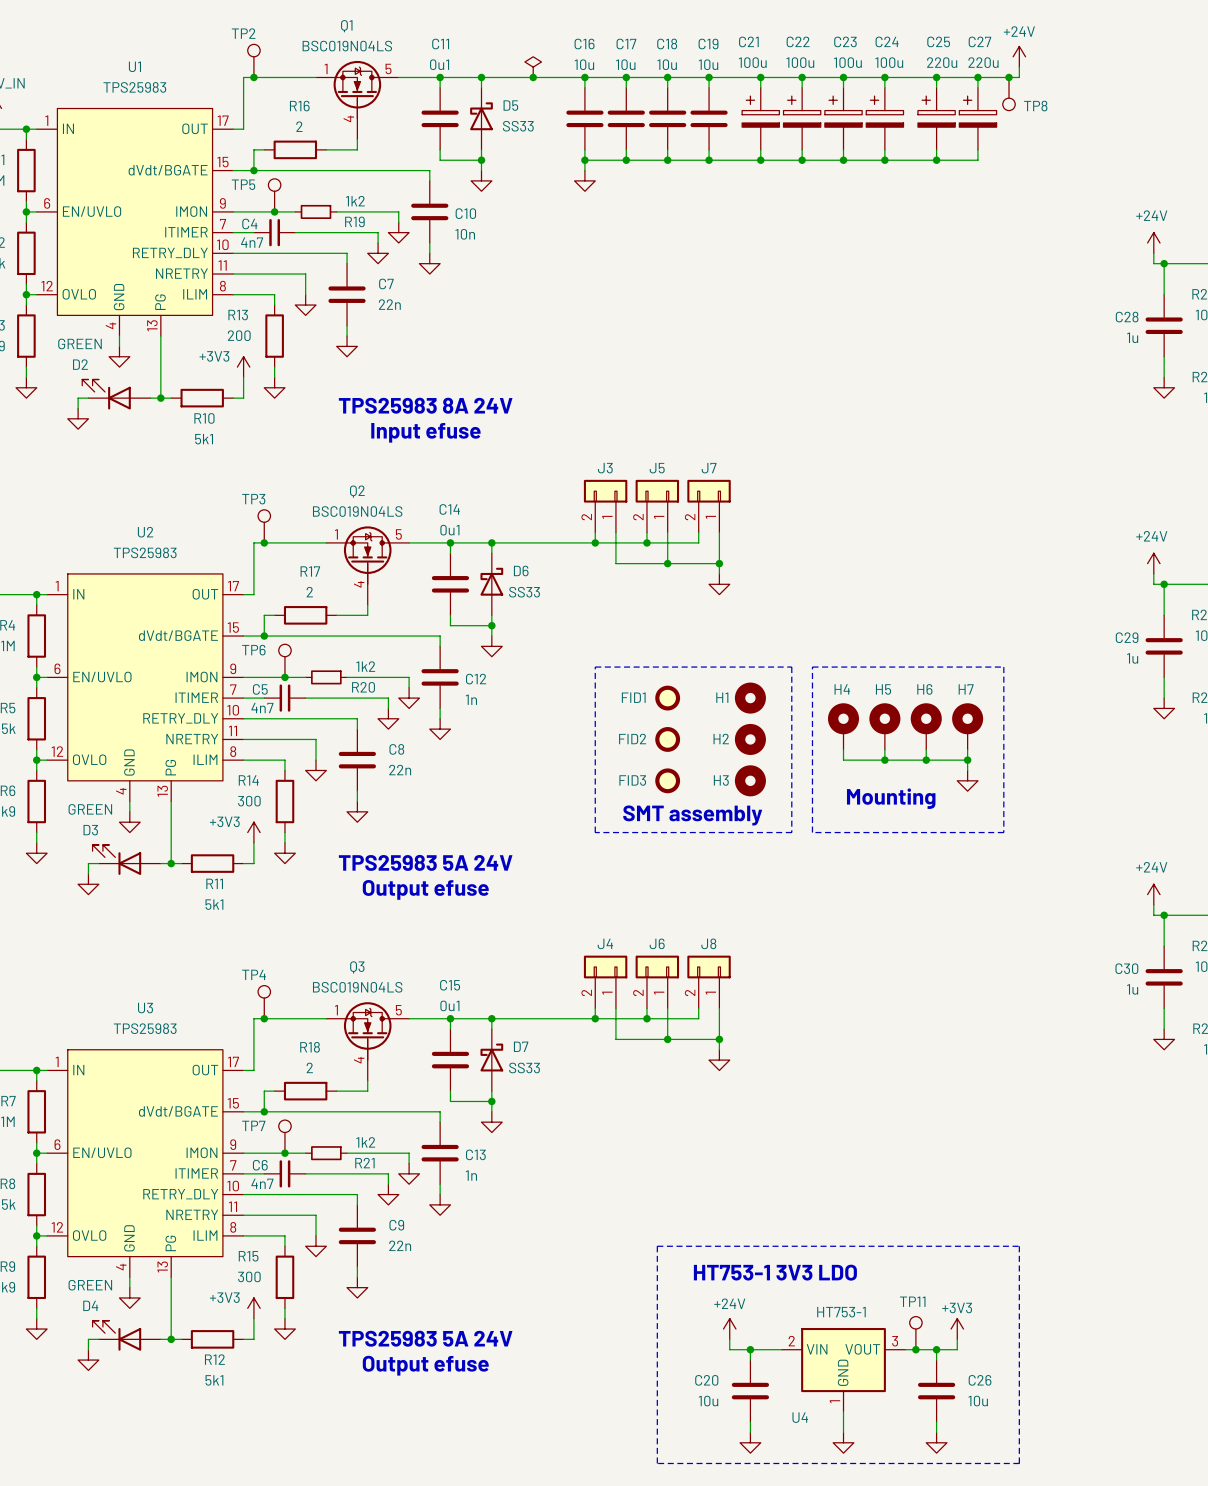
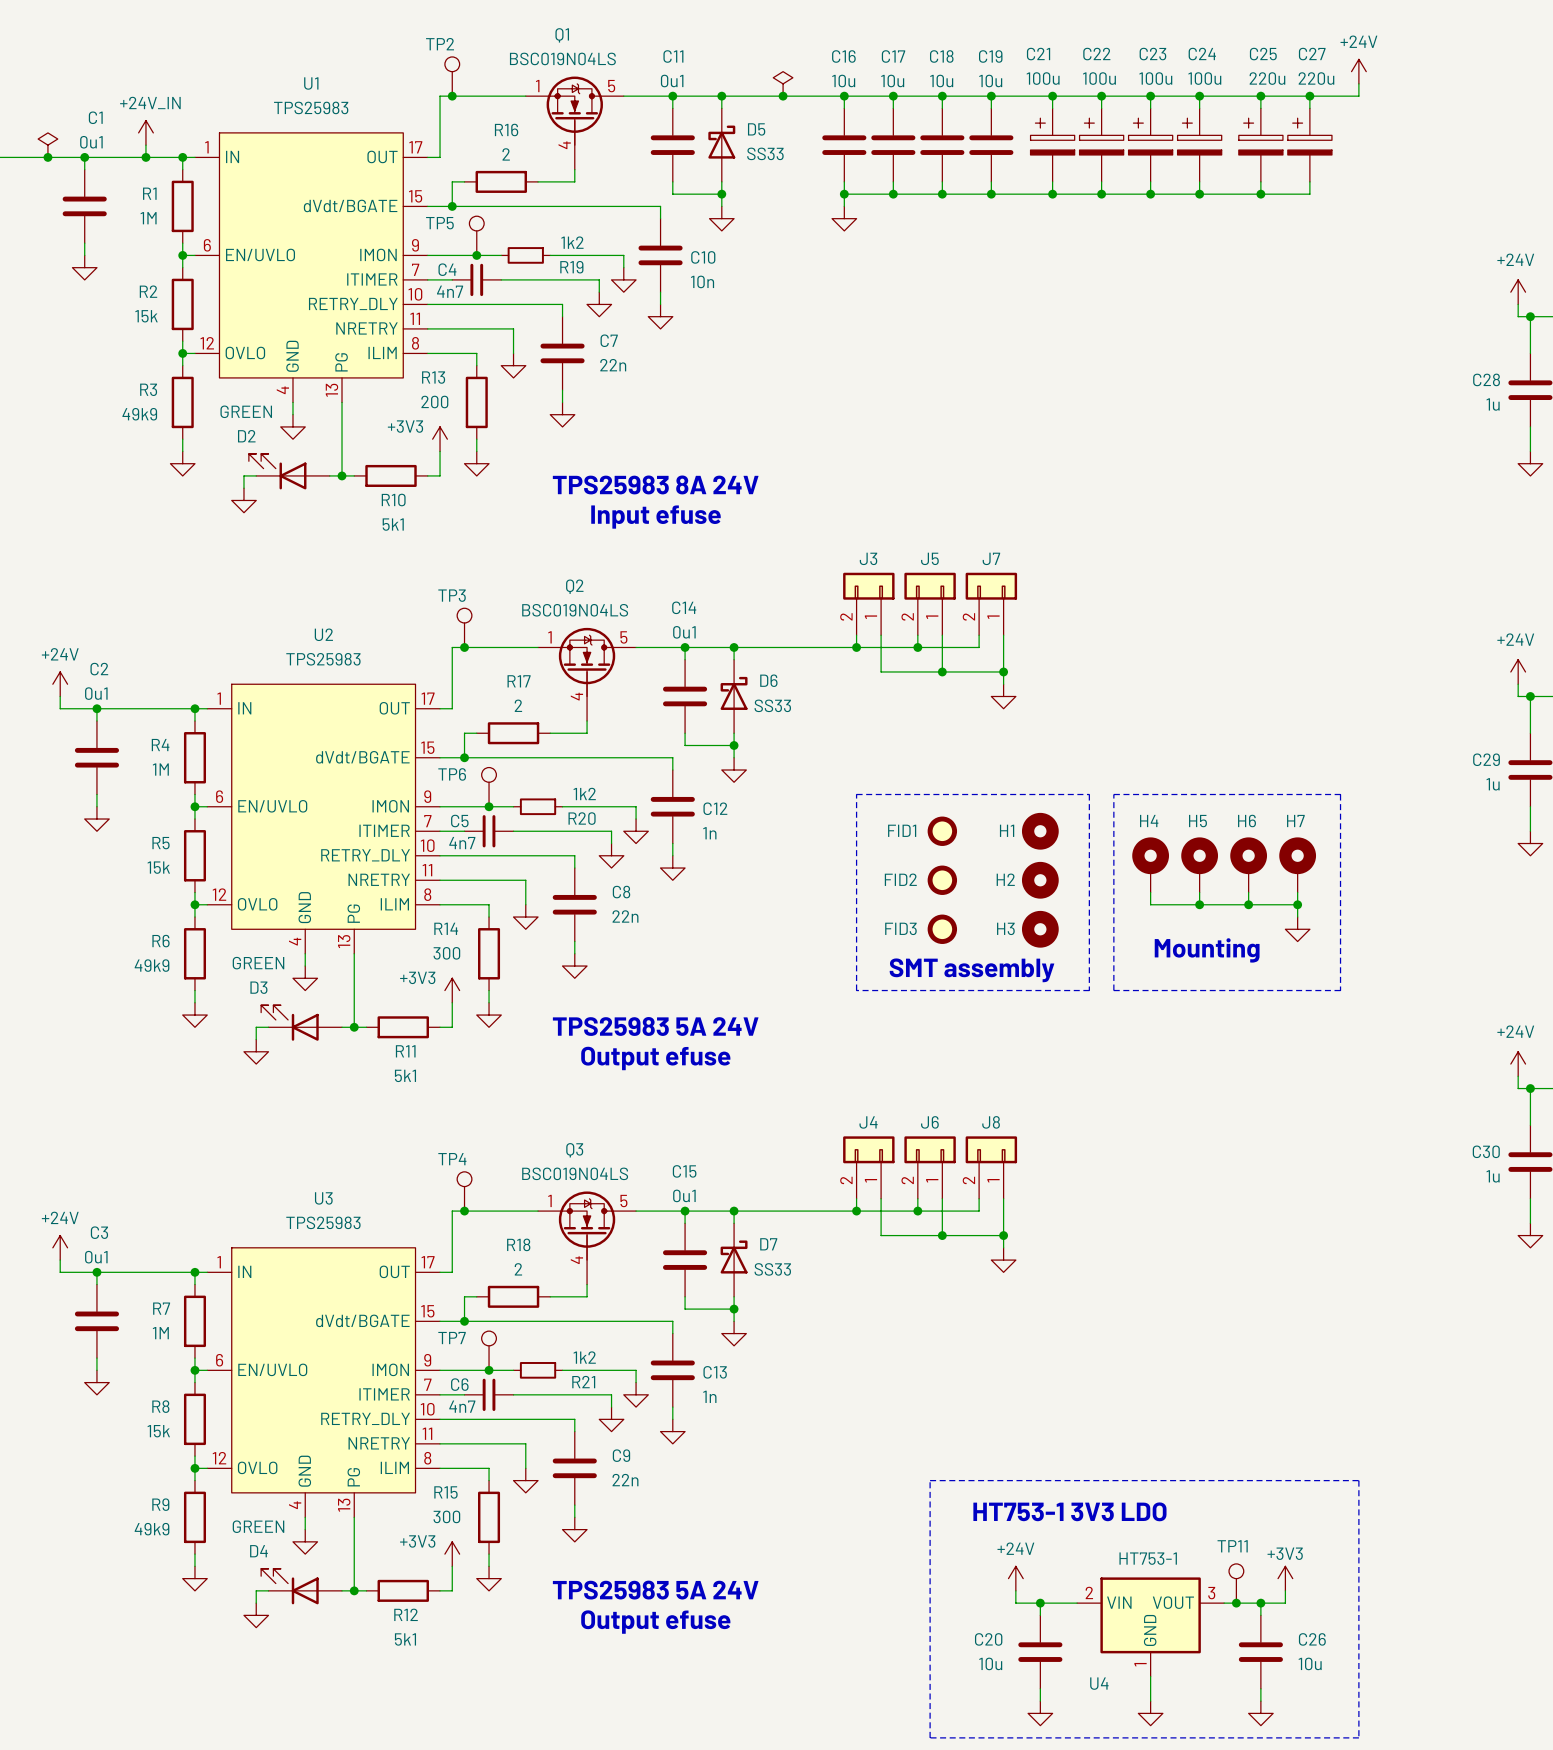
junction: (1009, 77) -> none
TP8: (1009, 94) -> none

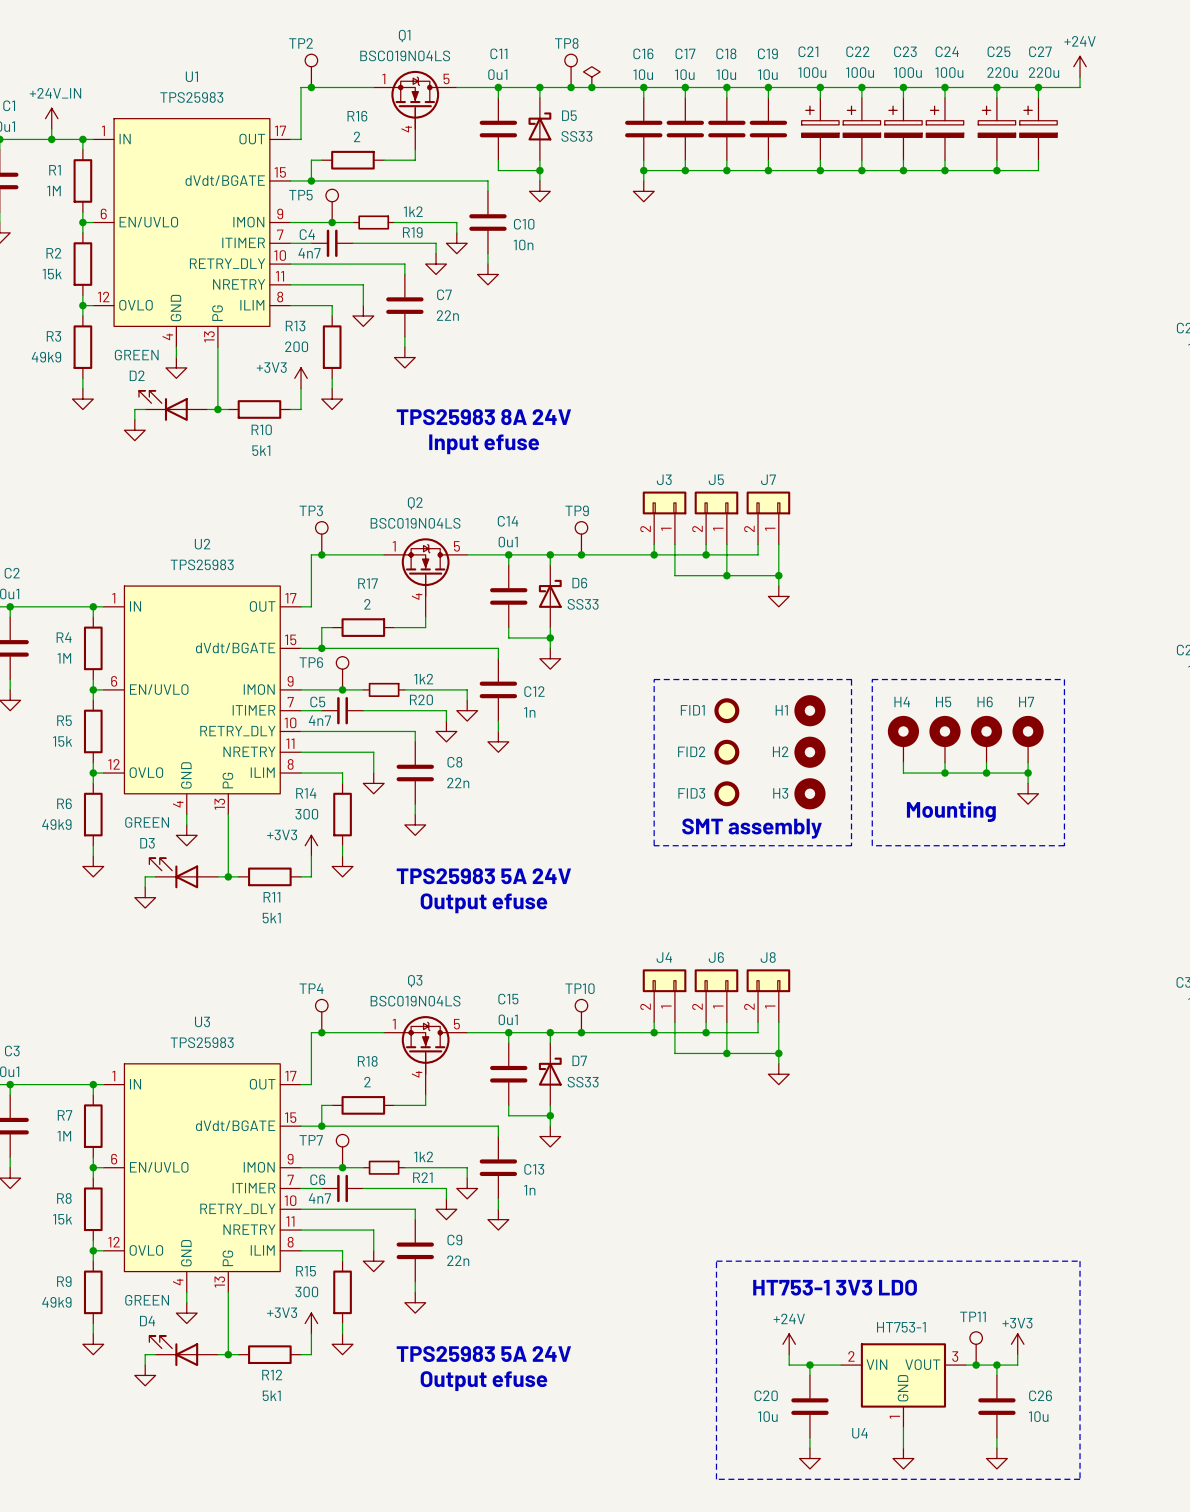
TP8: none -> (571, 70)
junction: none -> (571, 87)
TP9: none -> (581, 538)
junction: none -> (581, 554)
TP10: none -> (581, 1016)
junction: none -> (581, 1032)

